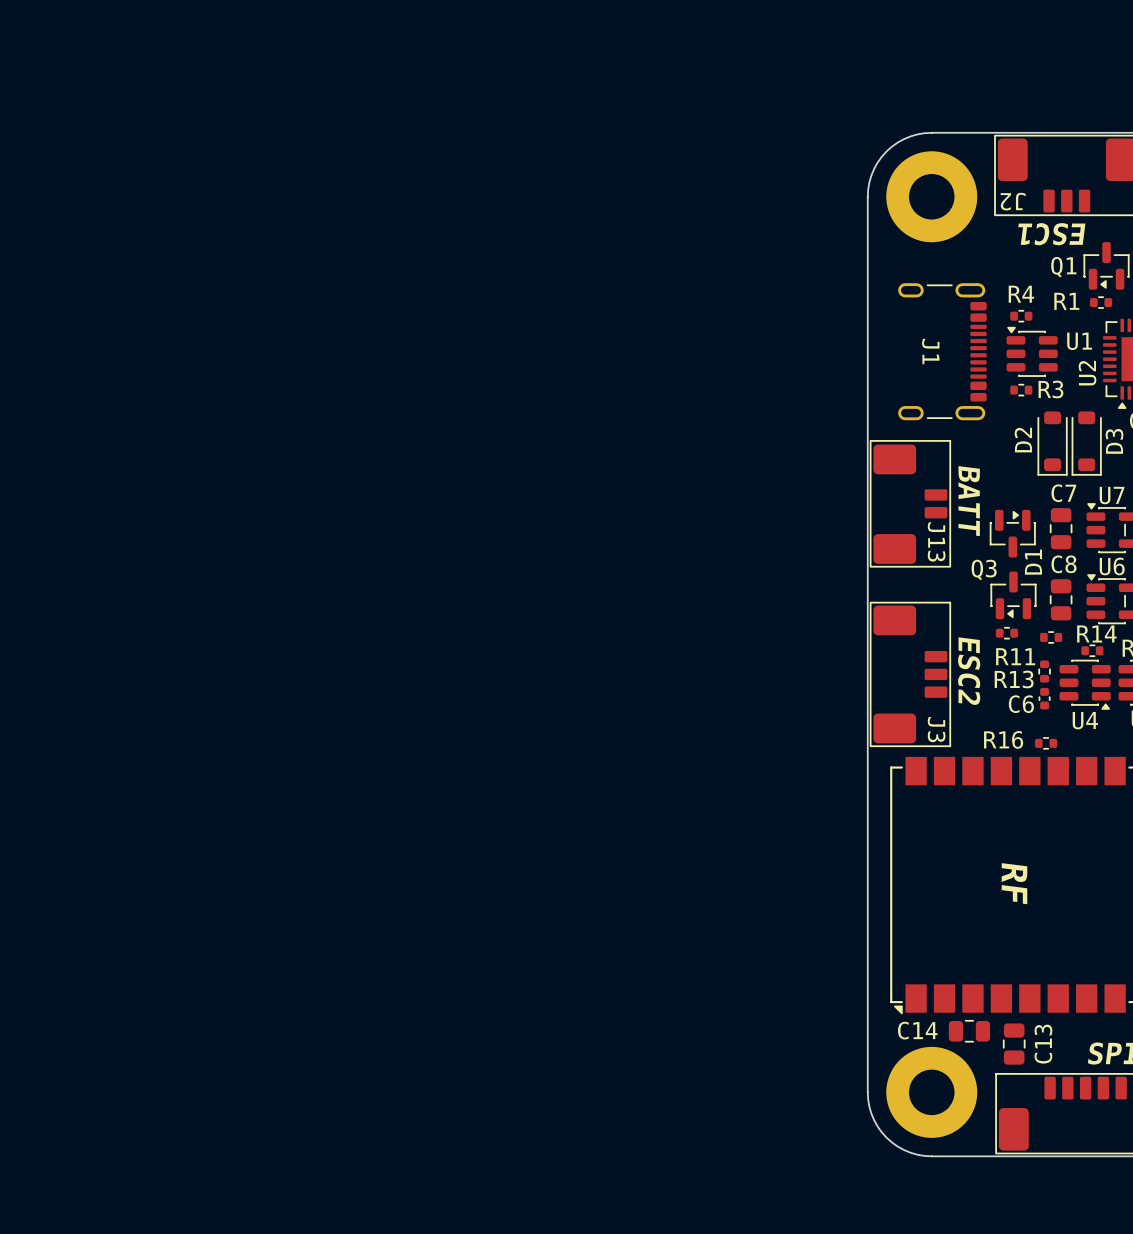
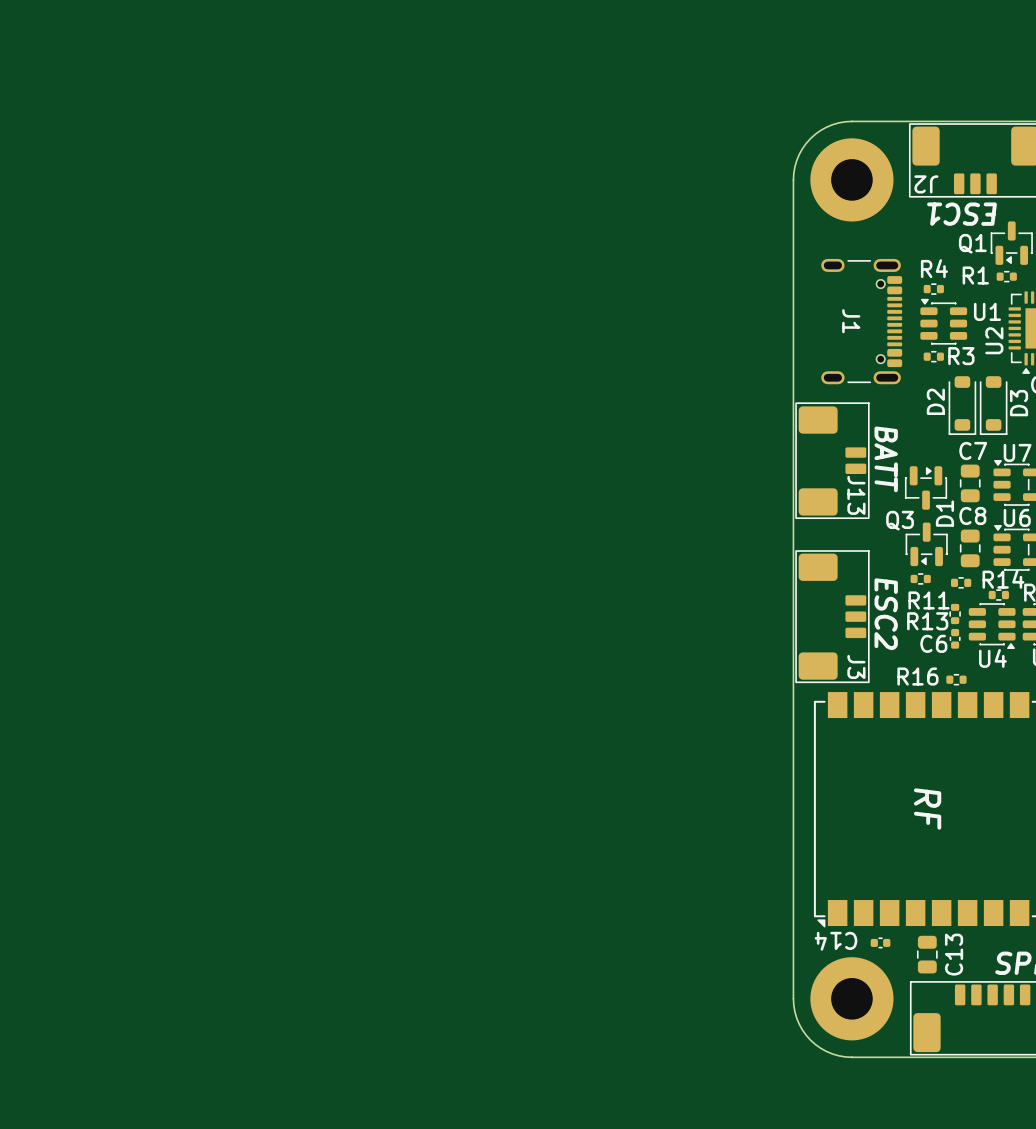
J1 footprint: [898, 283, 987, 421] -> [821, 258, 903, 385]
C14 footprint: [948, 1019, 991, 1043] -> [870, 937, 891, 949]

